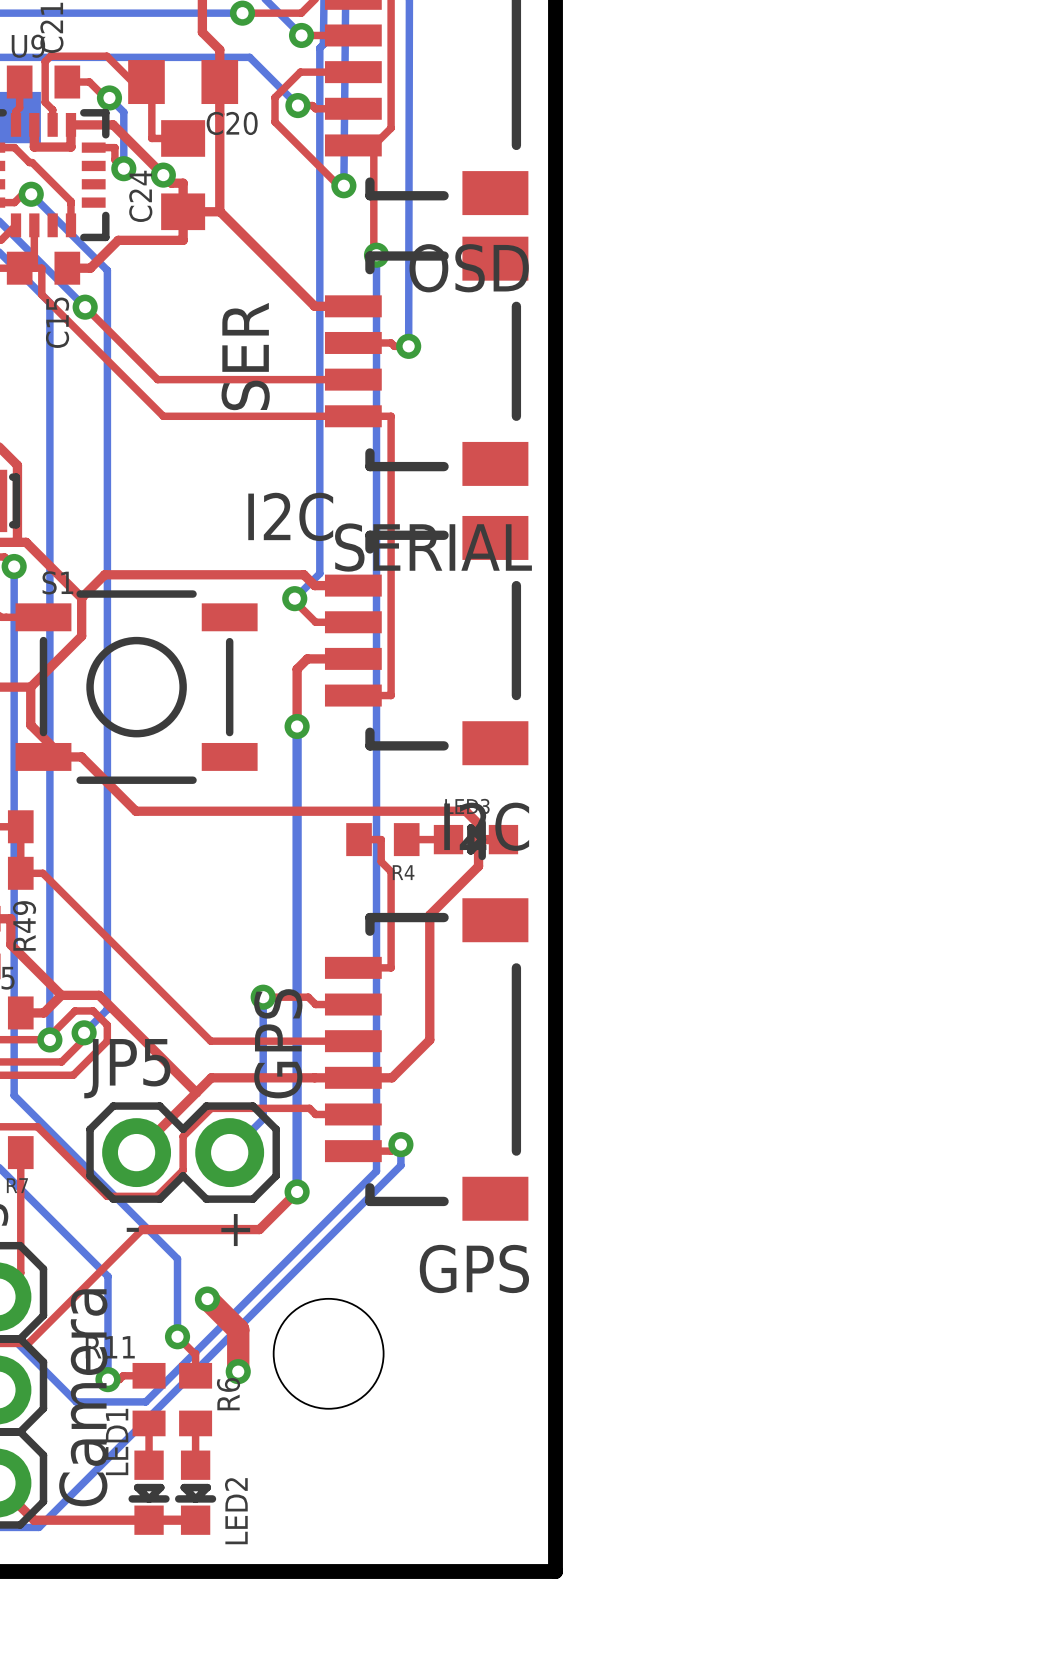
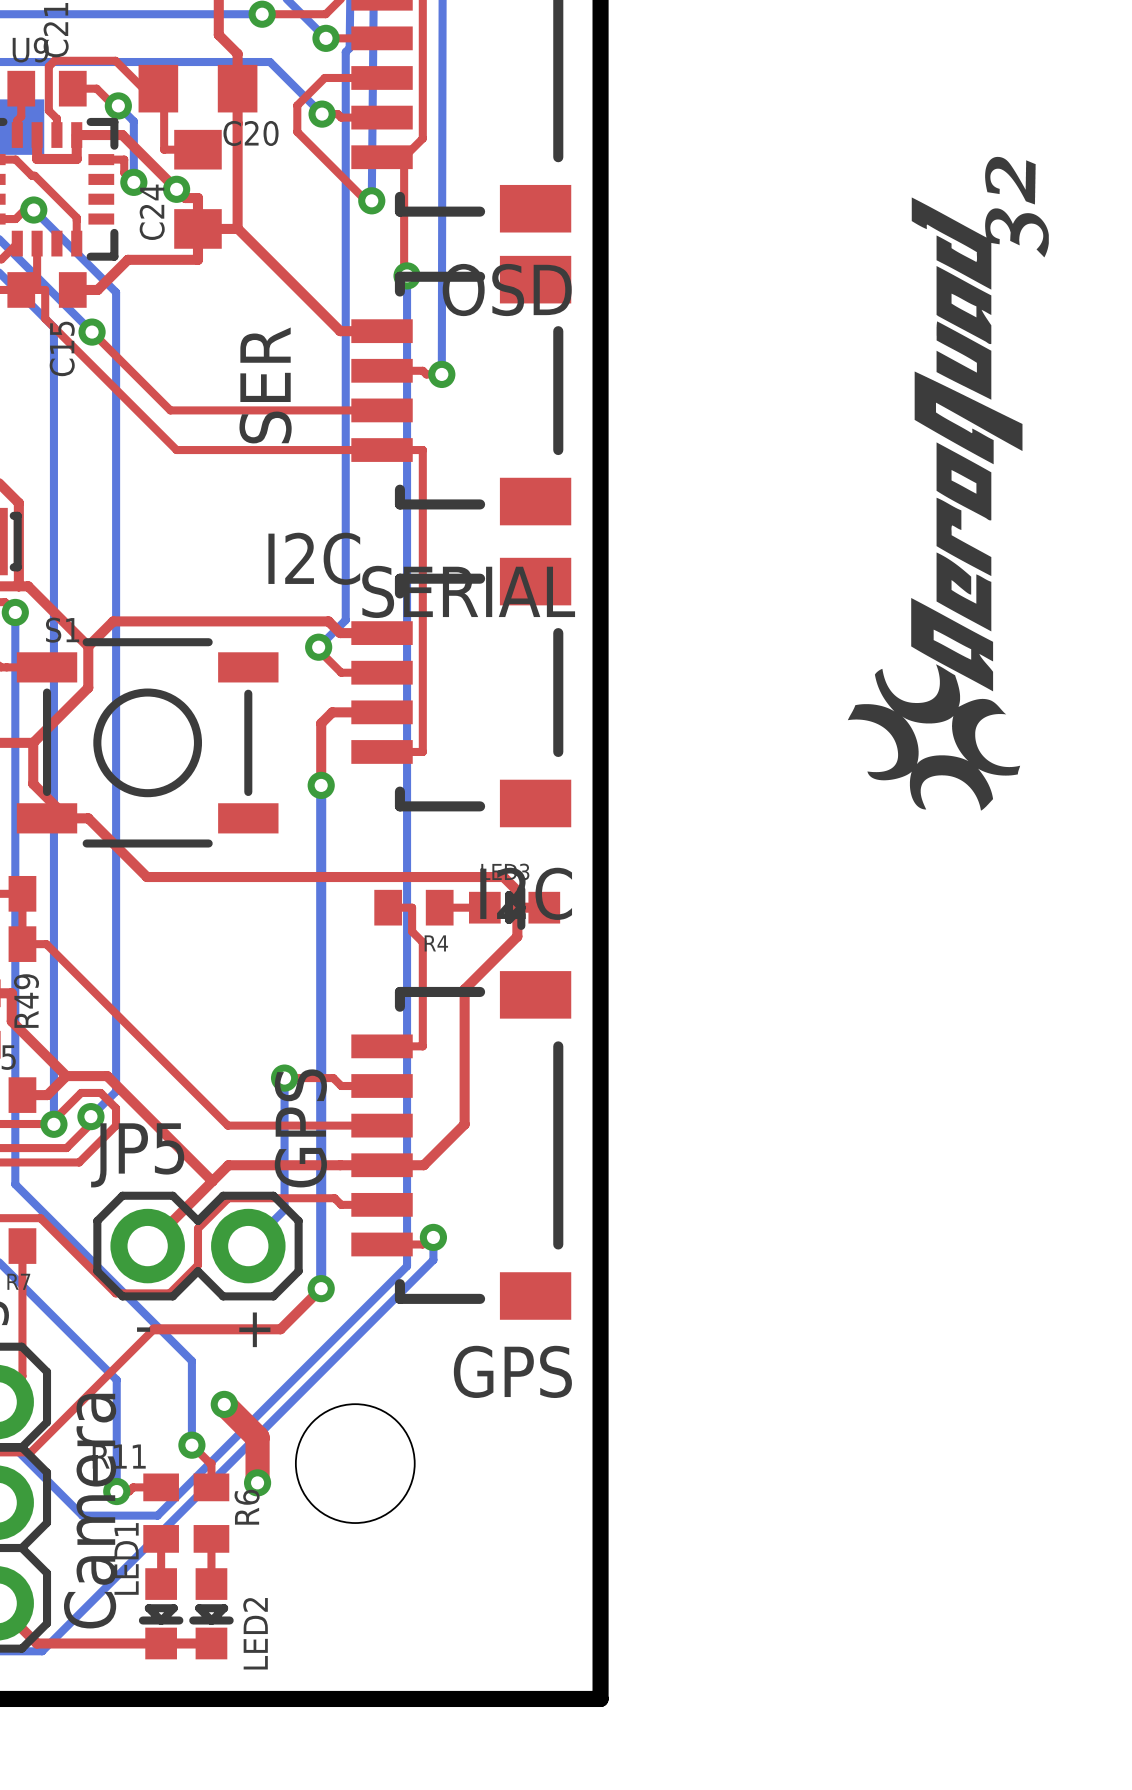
drawing: none -> [847, 156, 1049, 811]

